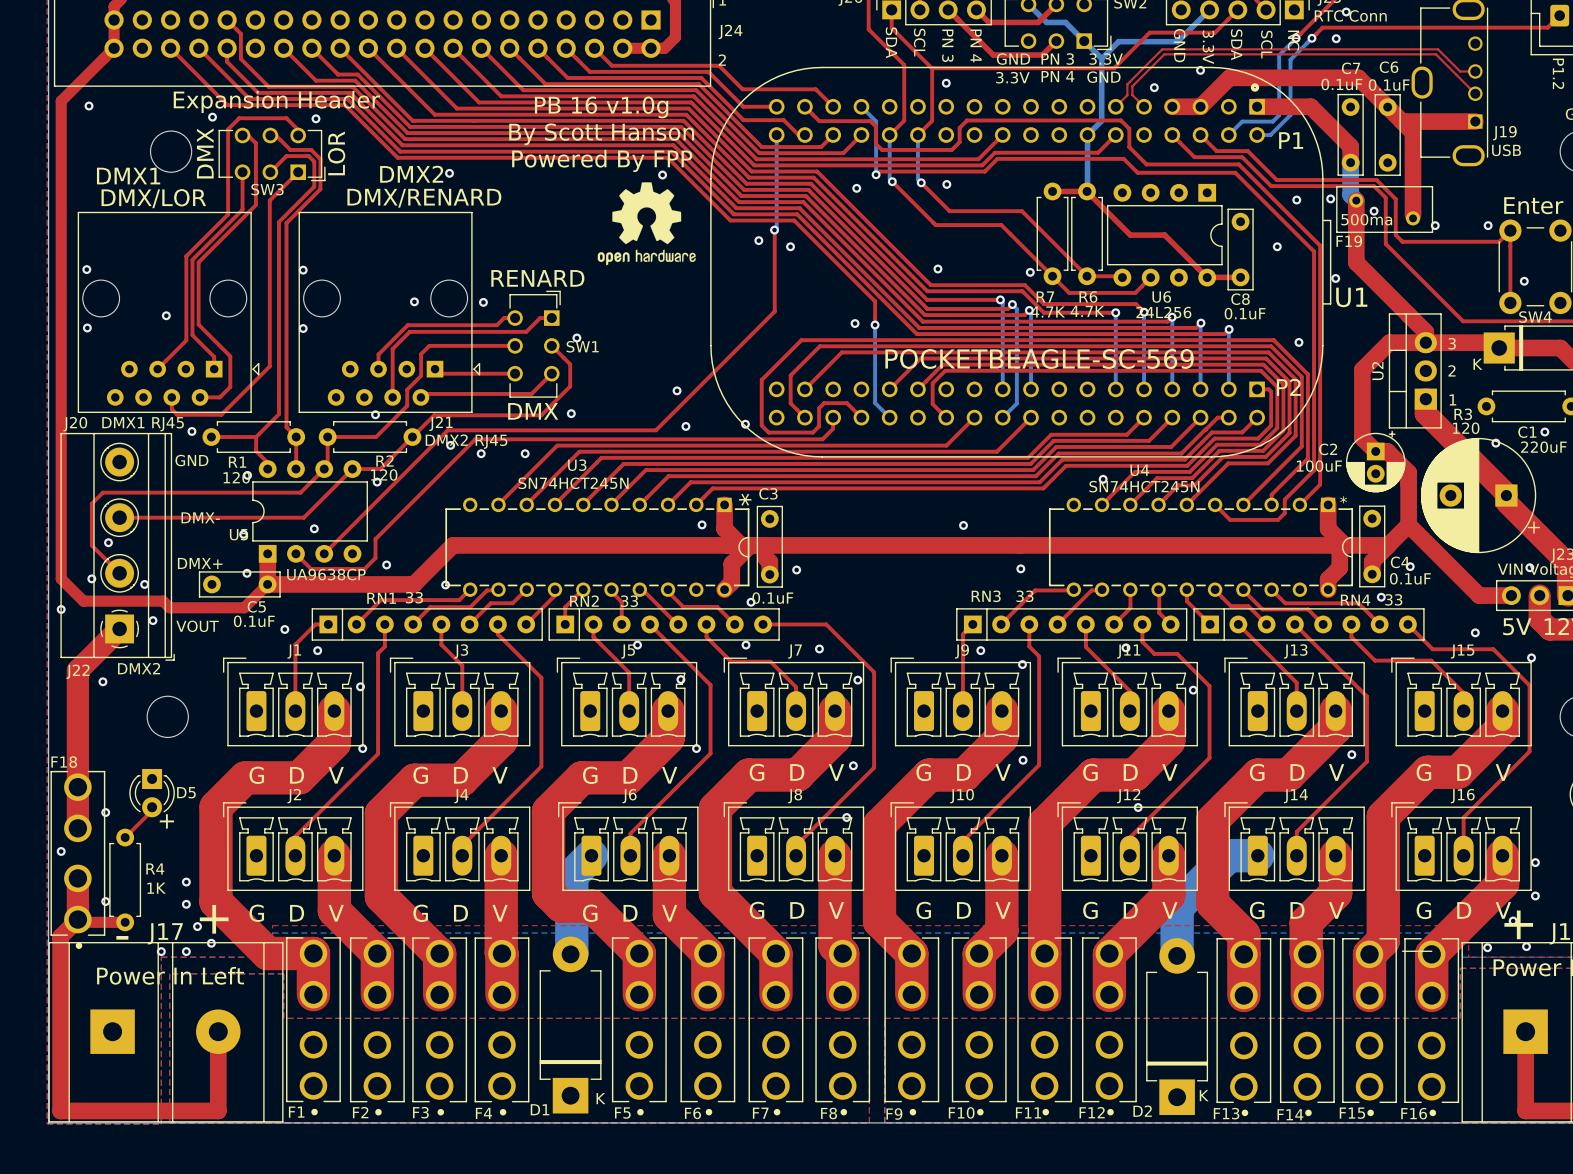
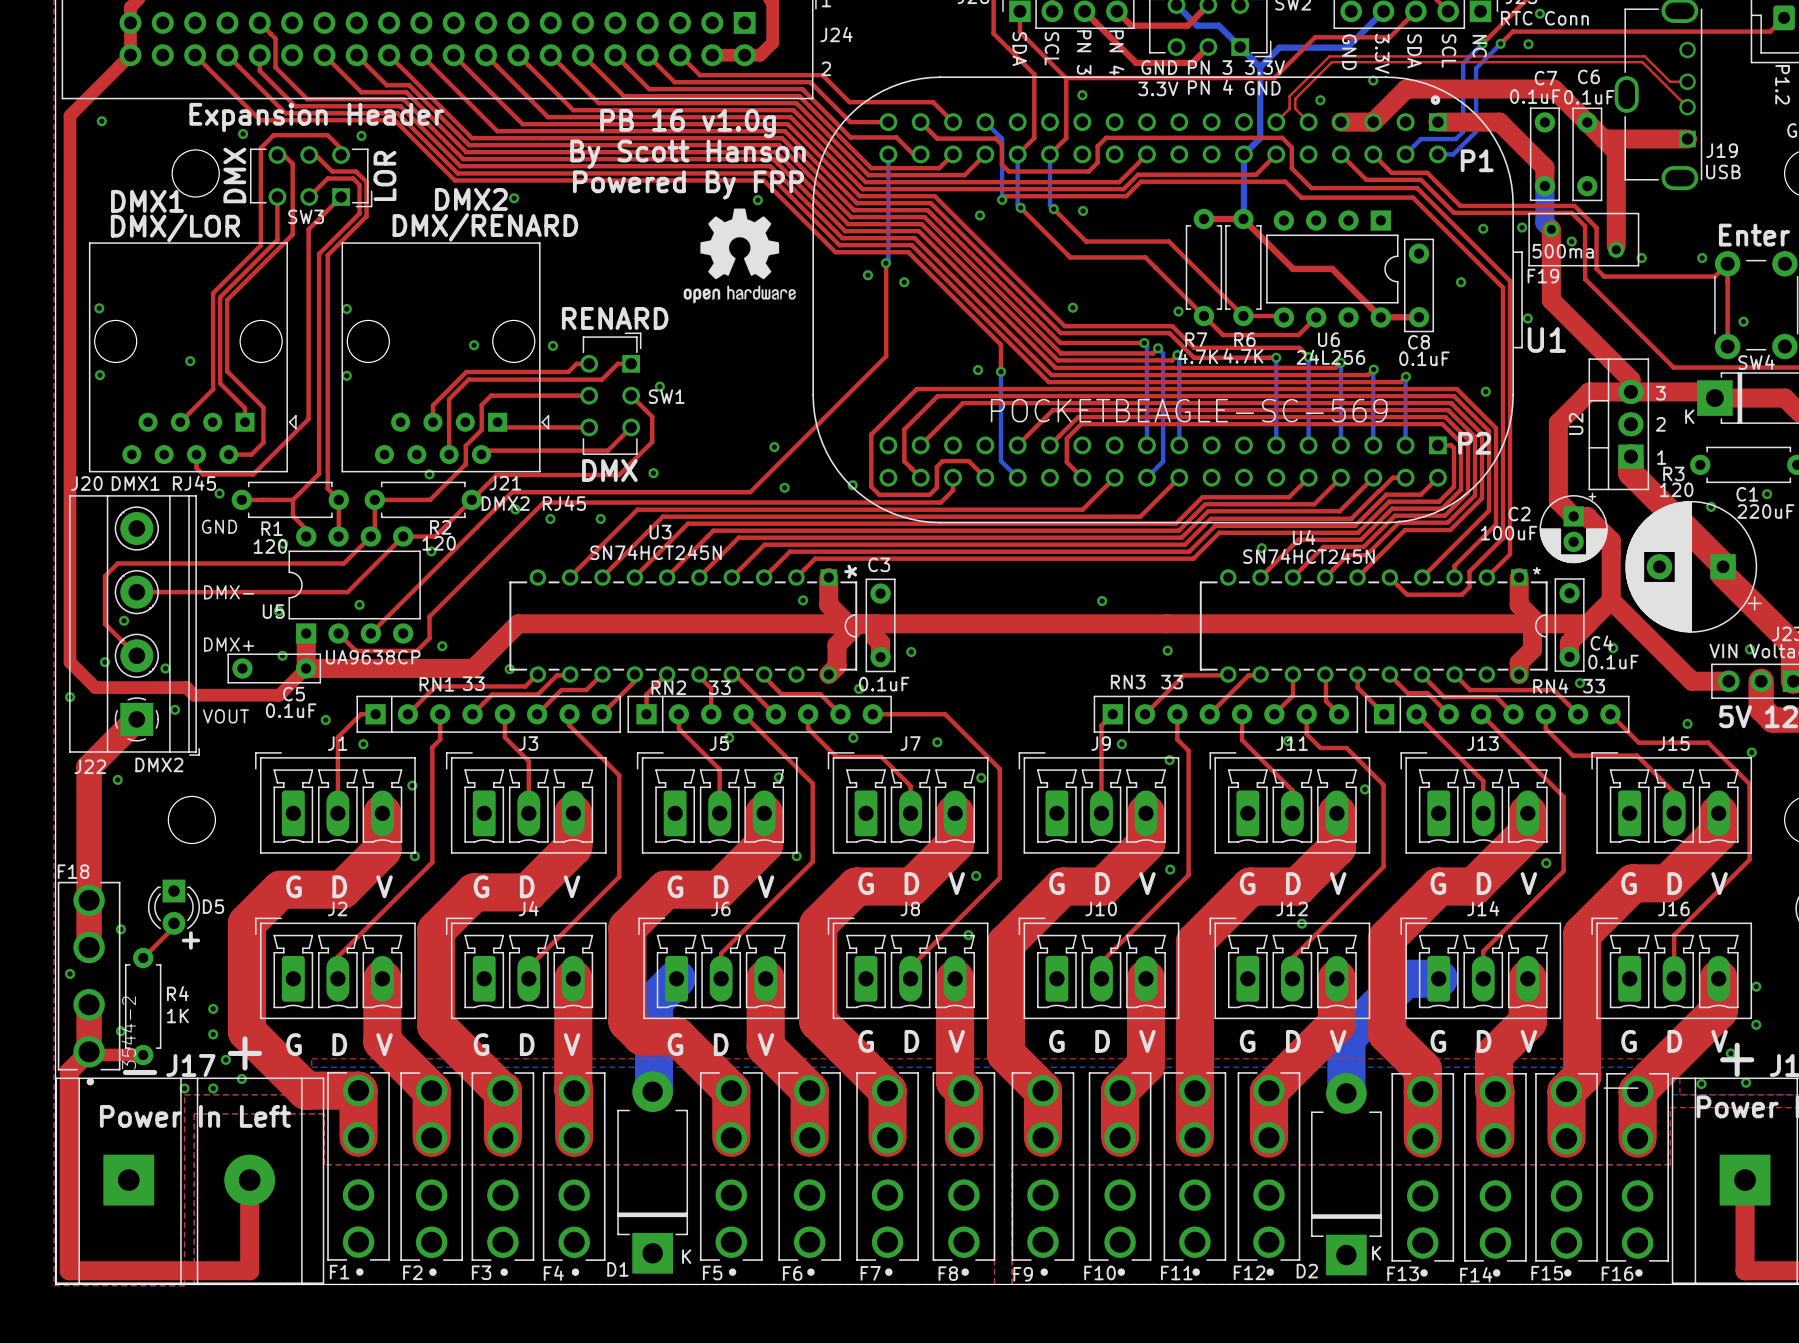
F18 value: none -> 3544-2 (128, 1032)

